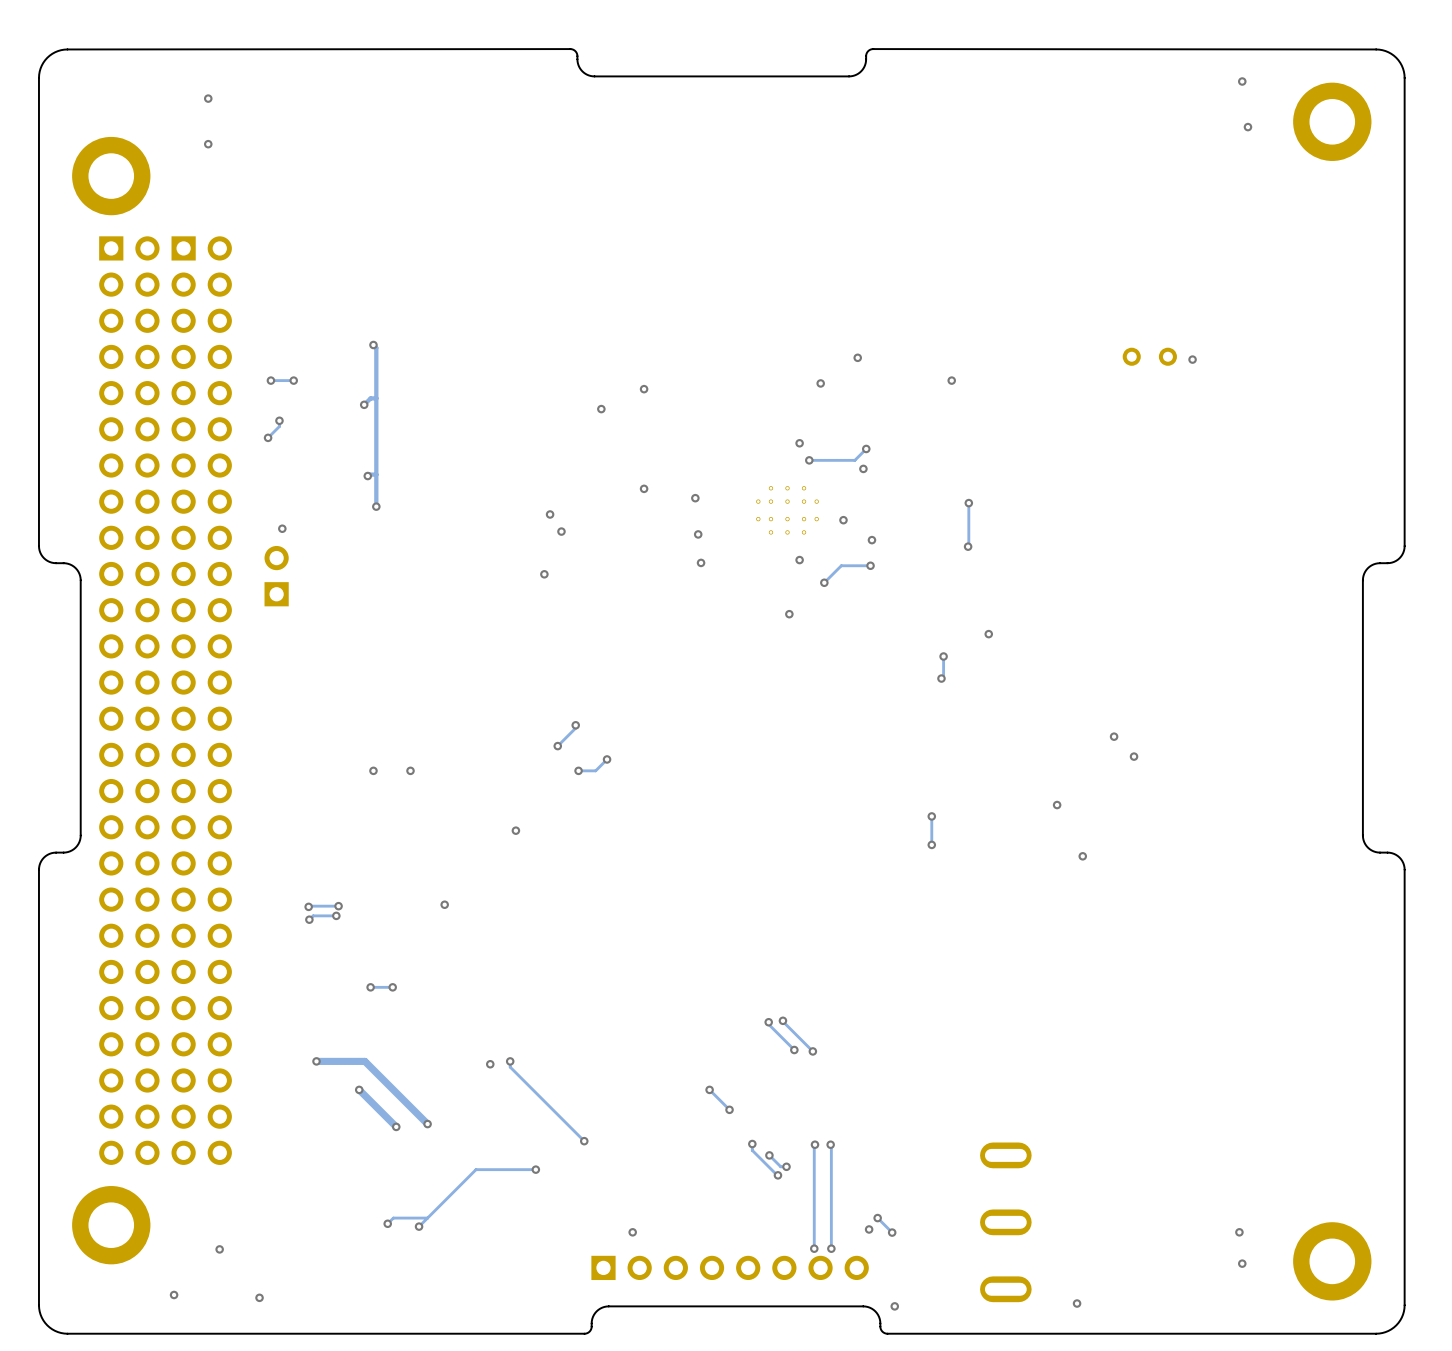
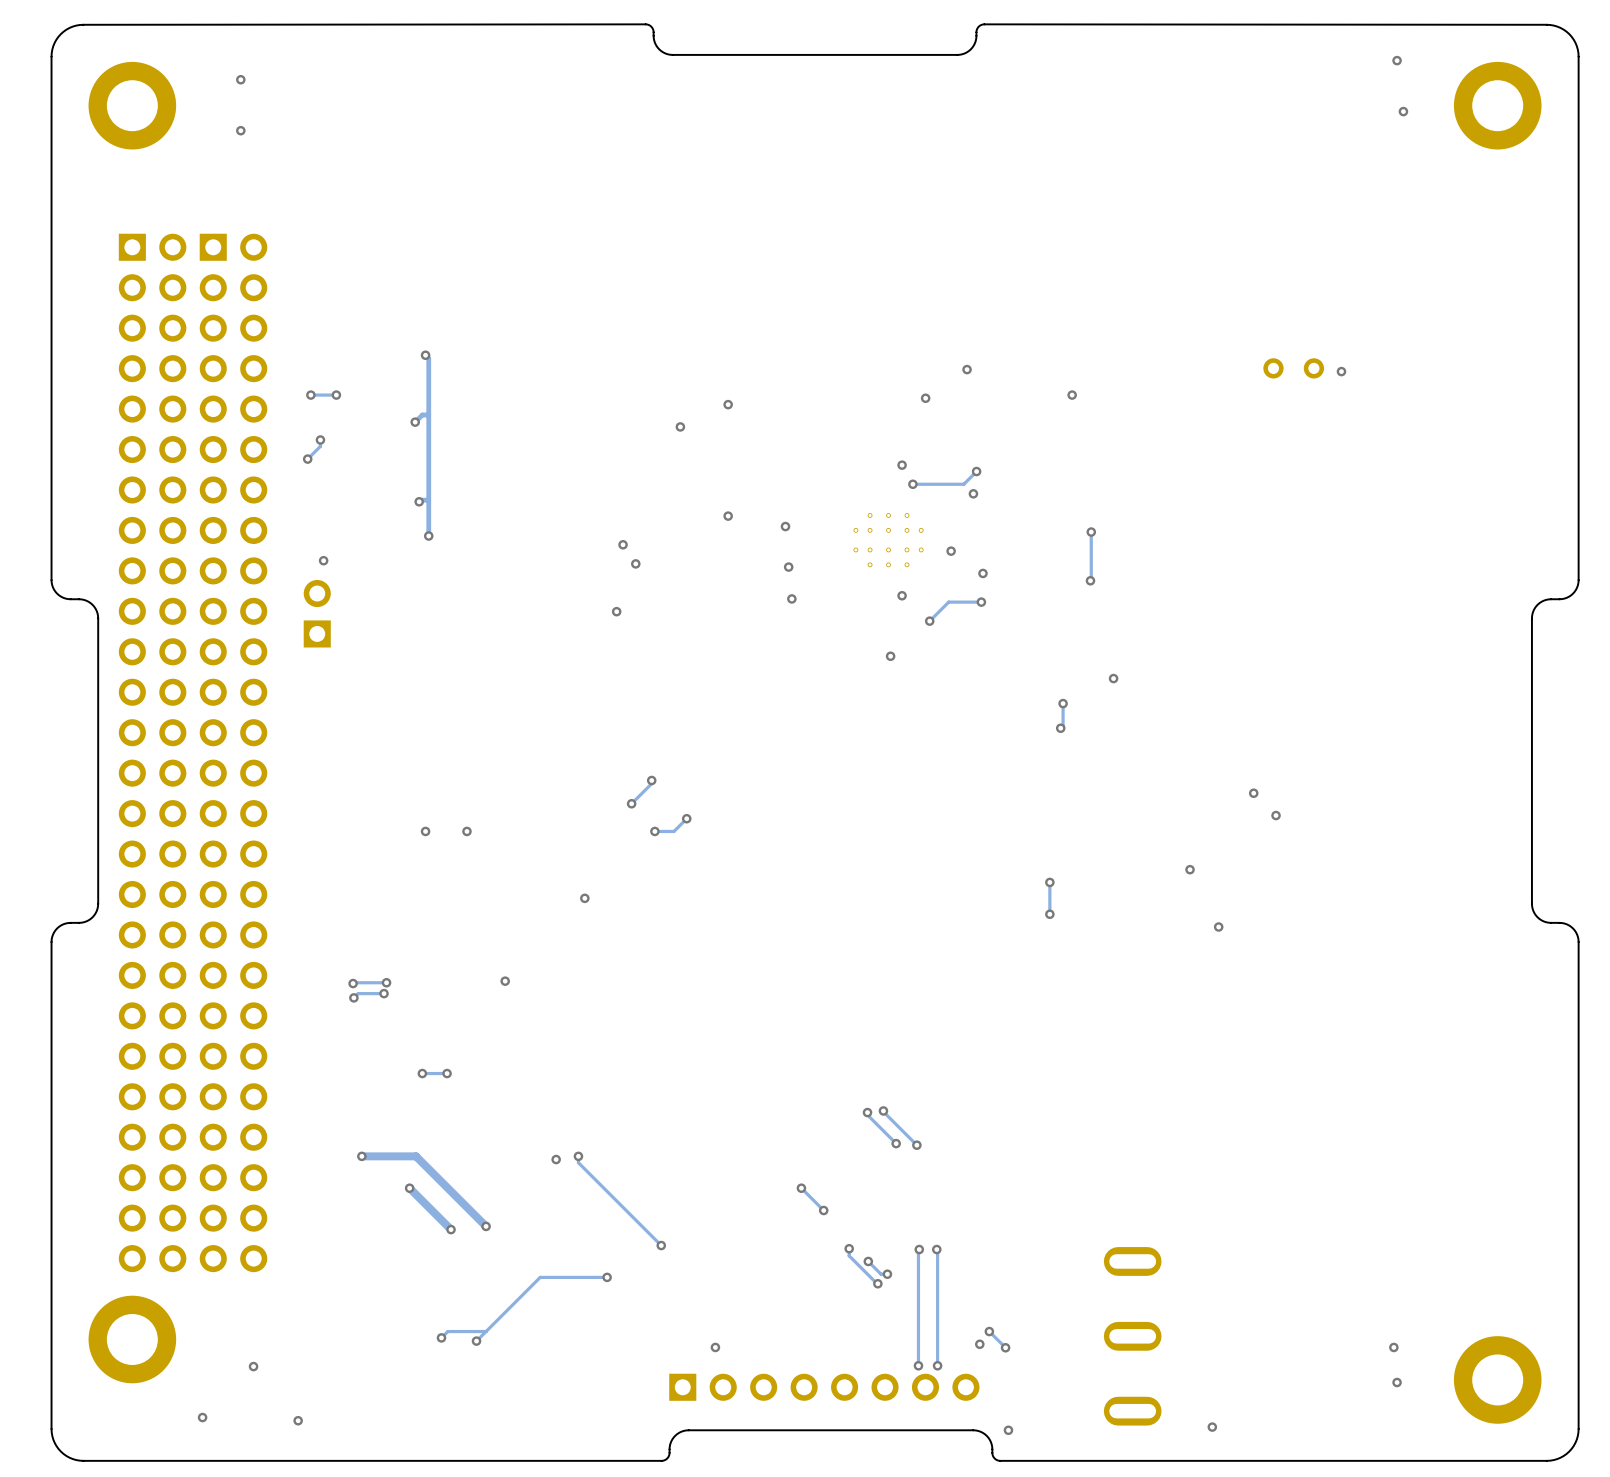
part position: (111, 176) -> (132, 105)

